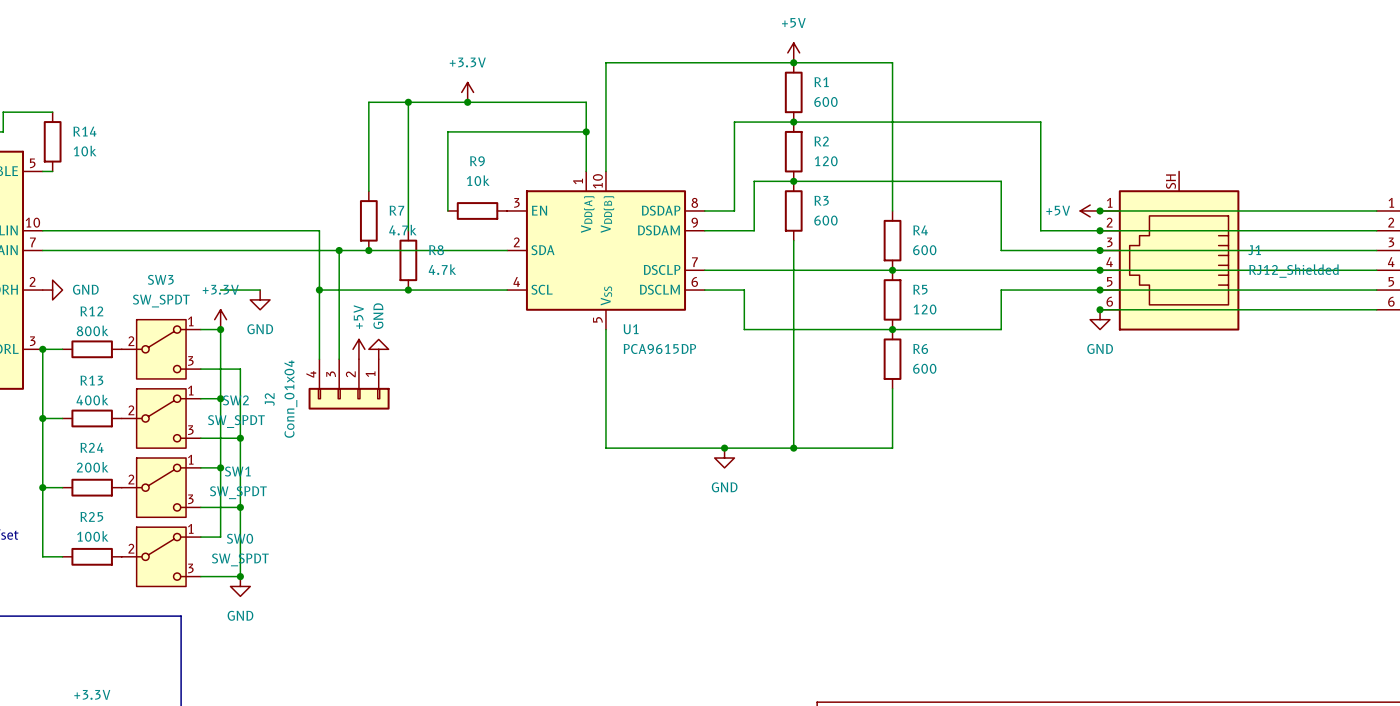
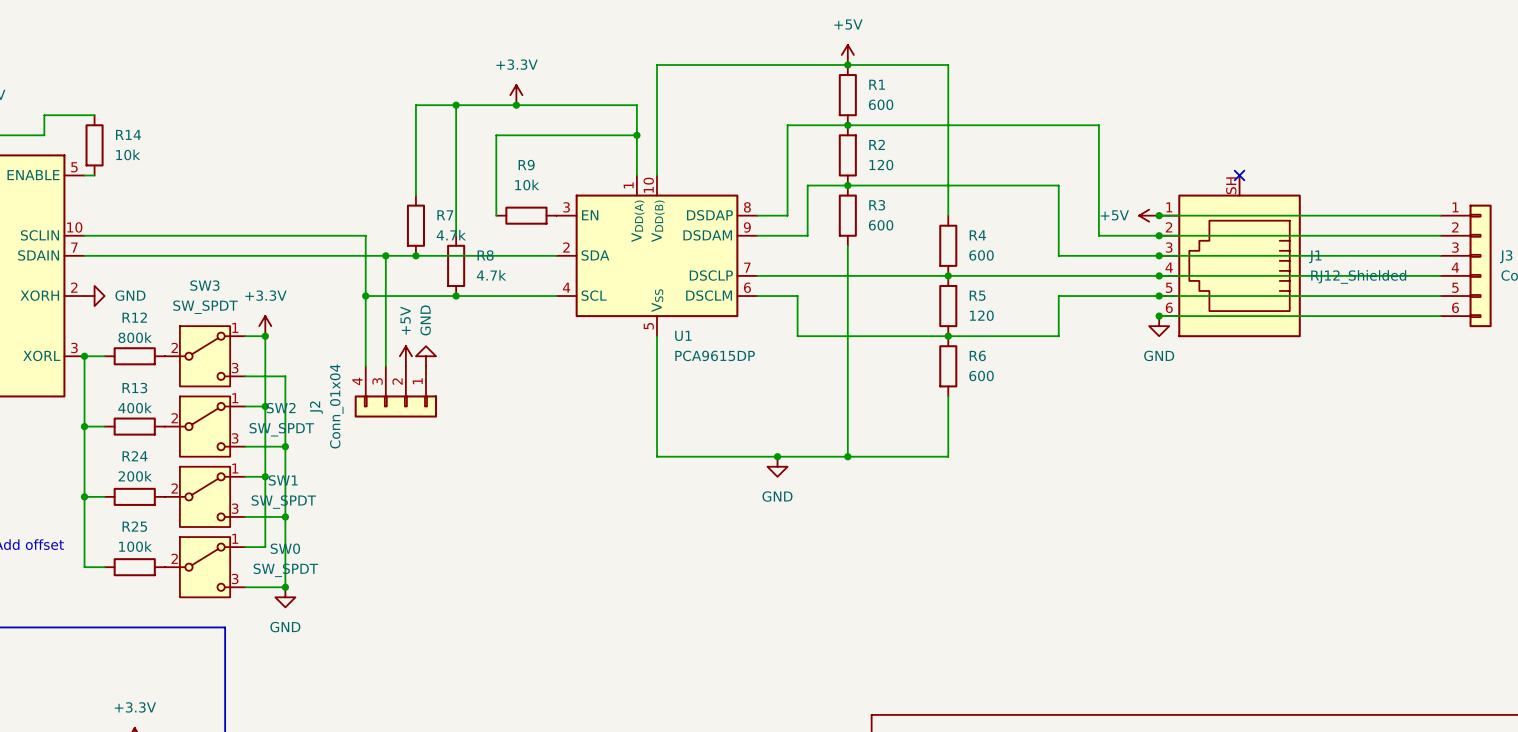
no-connect mark: none -> (1239, 175)
wire: (220, 290) (260, 290) -> none
power symbol: GND (260, 299) -> none

